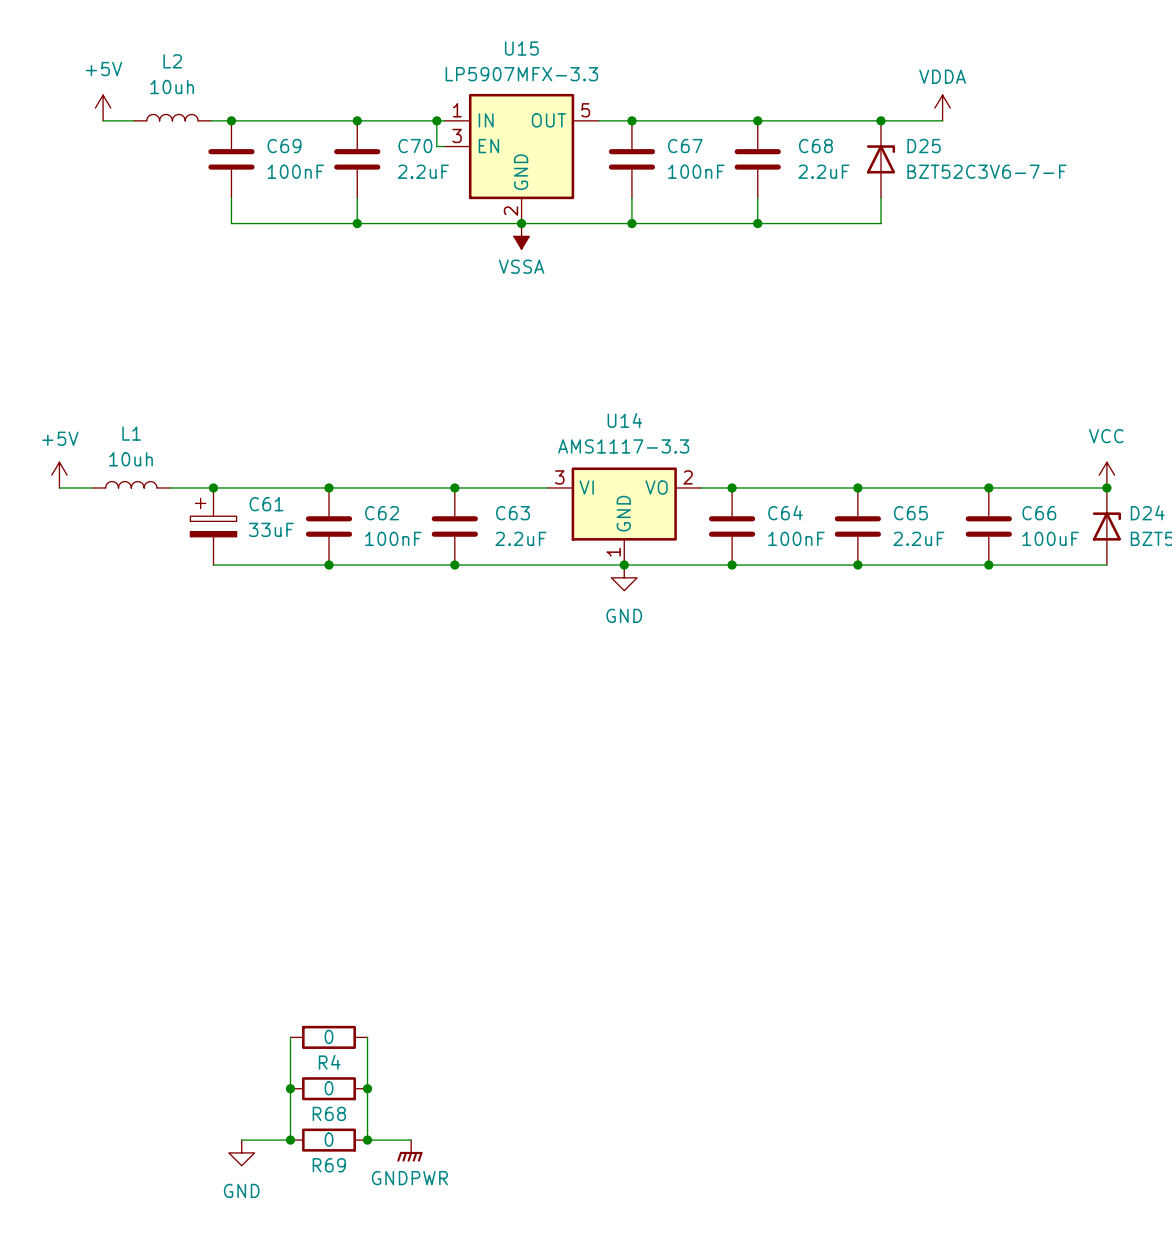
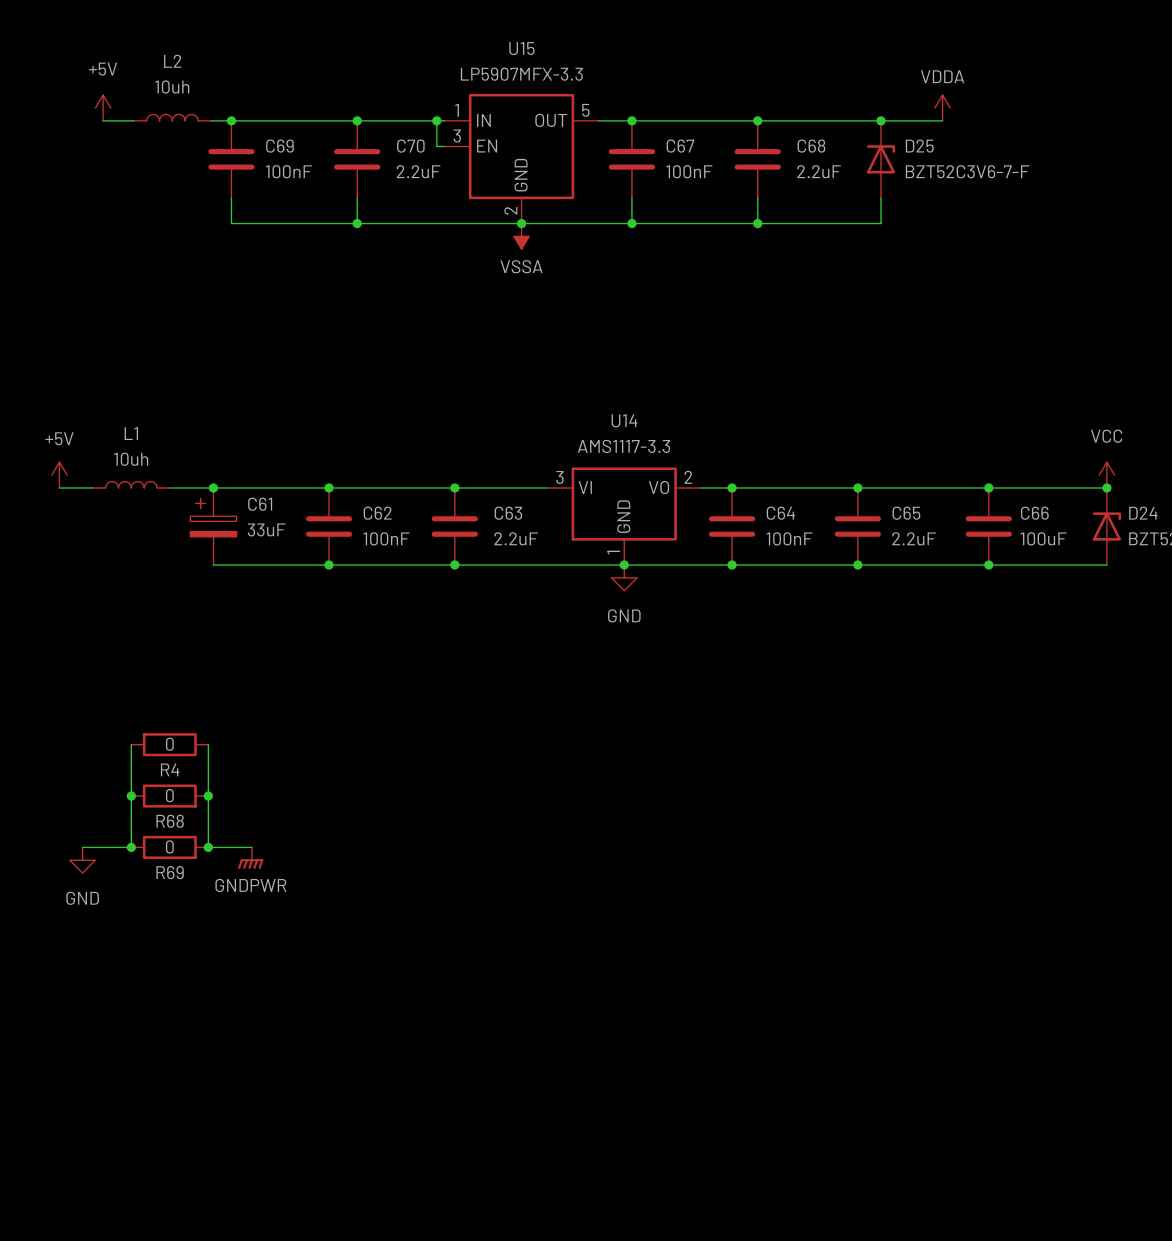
wire: none -> (131, 744) (131, 847) (82, 847)
wire: none -> (208, 744) (208, 847) (251, 847)
junction: none -> (131, 796)
junction: none -> (208, 796)
junction: none -> (131, 847)
junction: none -> (208, 847)
power symbol: none -> GNDPWR (250, 858)
power symbol: none -> GND (82, 860)
wire: (290, 1037) (290, 1140) (241, 1140) -> none
R4 position: (329, 1037) -> (169, 744)
wire: (367, 1037) (367, 1140) (411, 1140) -> none
junction: (290, 1088) -> none
R68 position: (329, 1088) -> (169, 796)
junction: (367, 1088) -> none
junction: (290, 1140) -> none
R69 position: (329, 1140) -> (169, 847)
junction: (367, 1140) -> none
power symbol: GNDPWR (409, 1150) -> none
power symbol: GND (241, 1152) -> none

